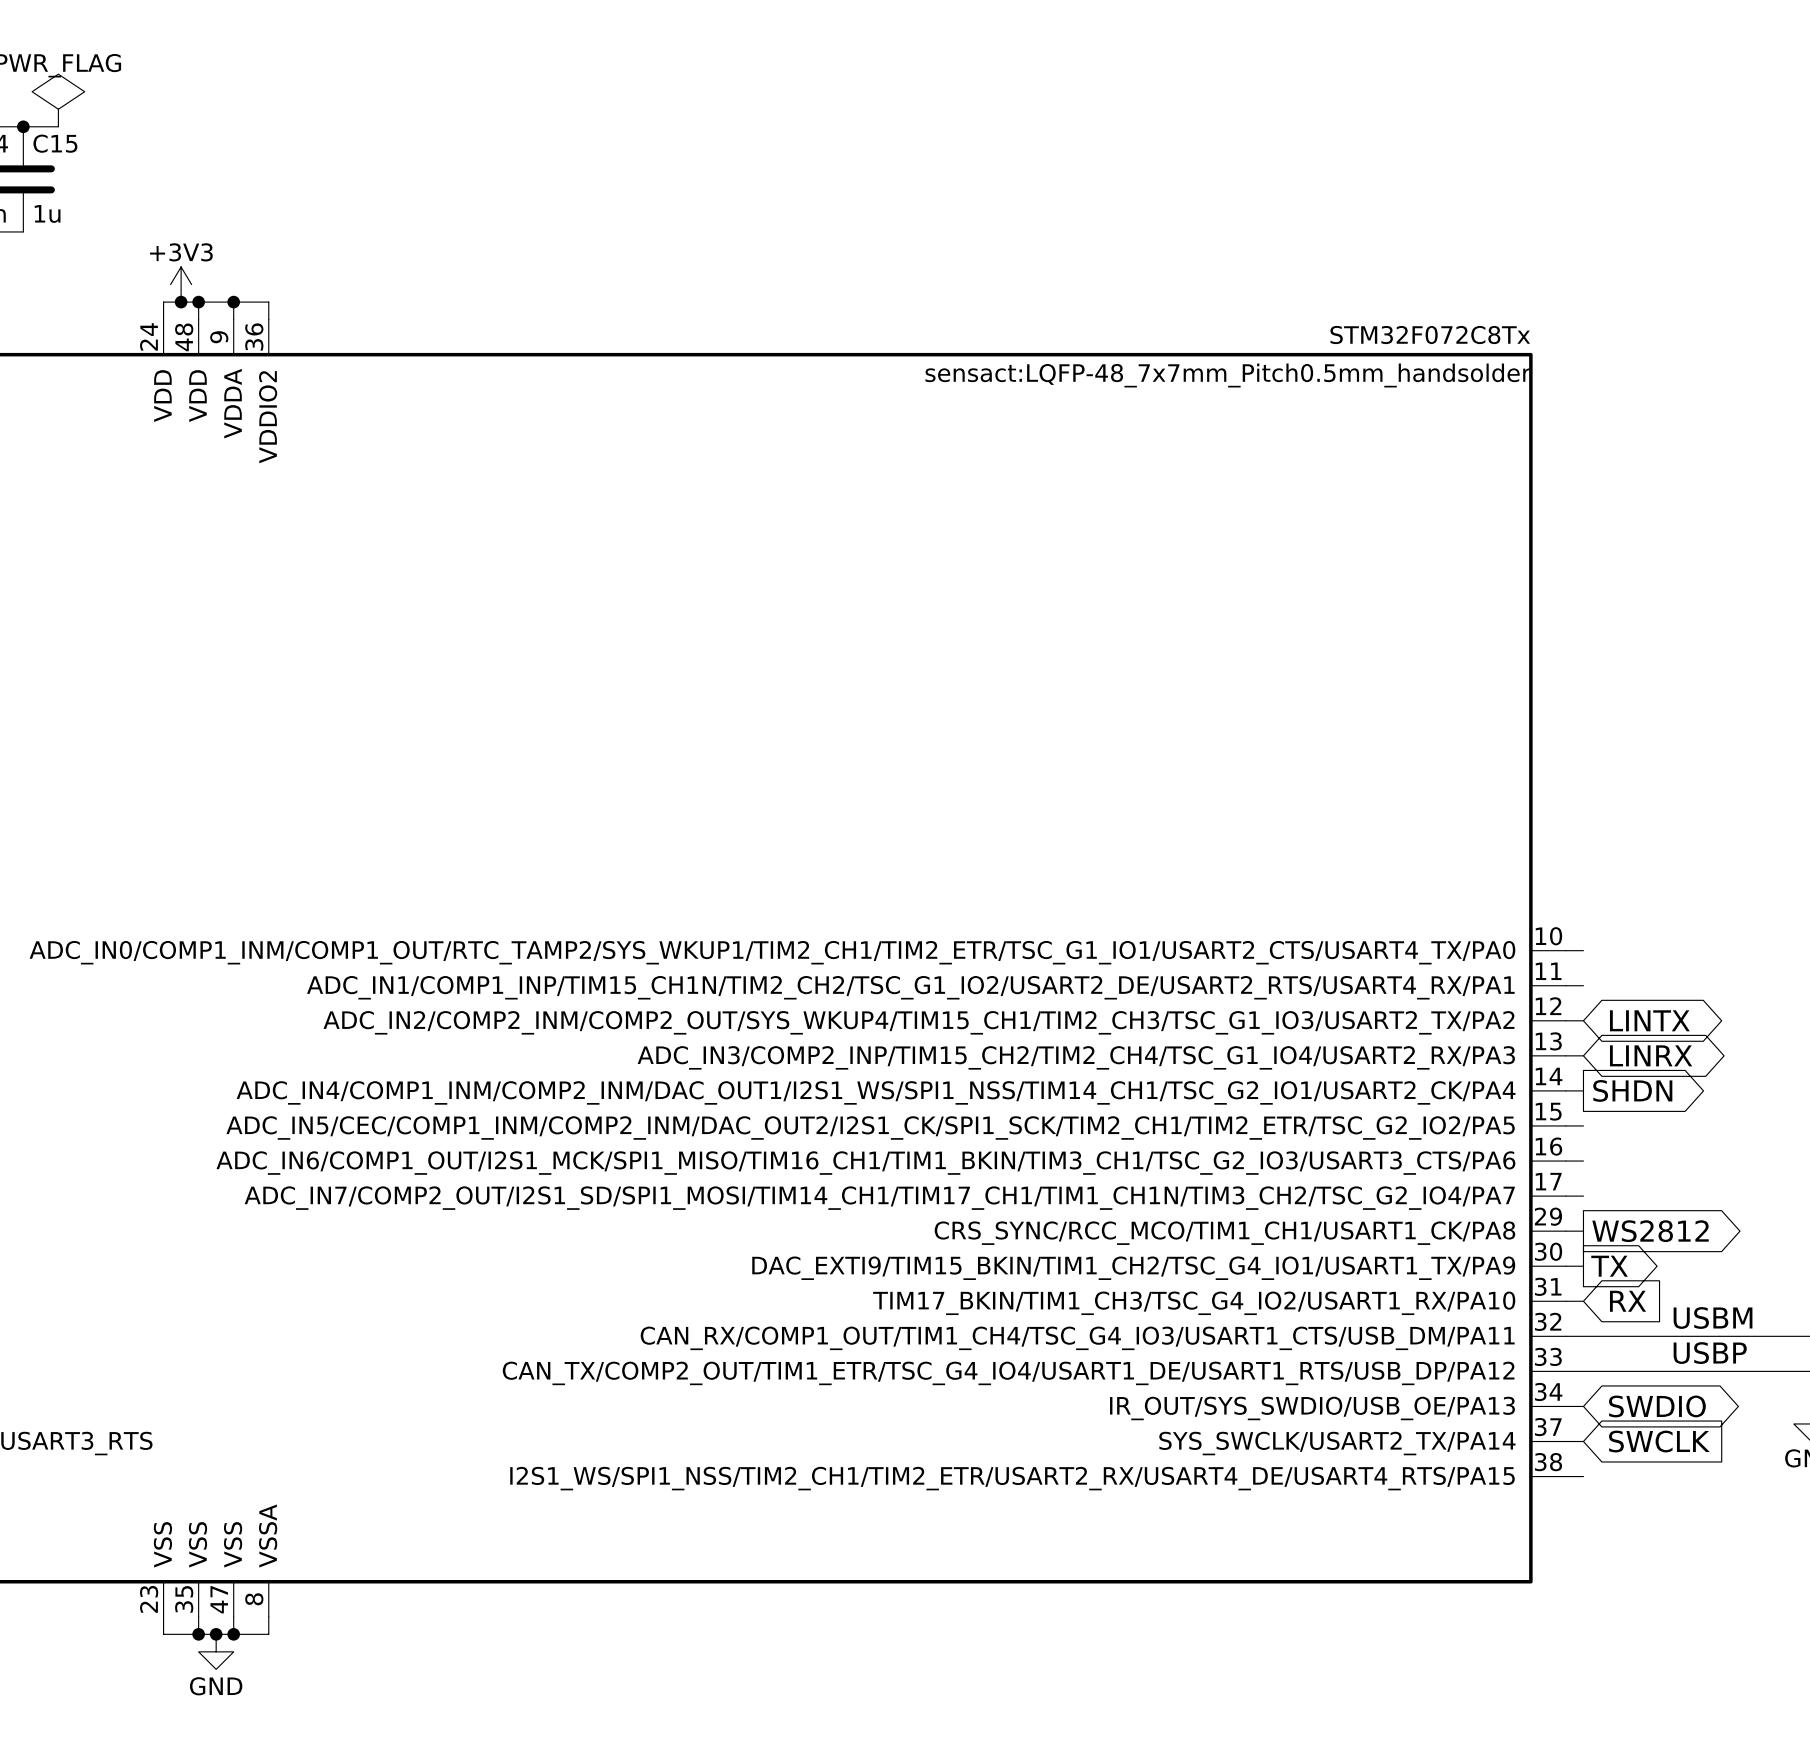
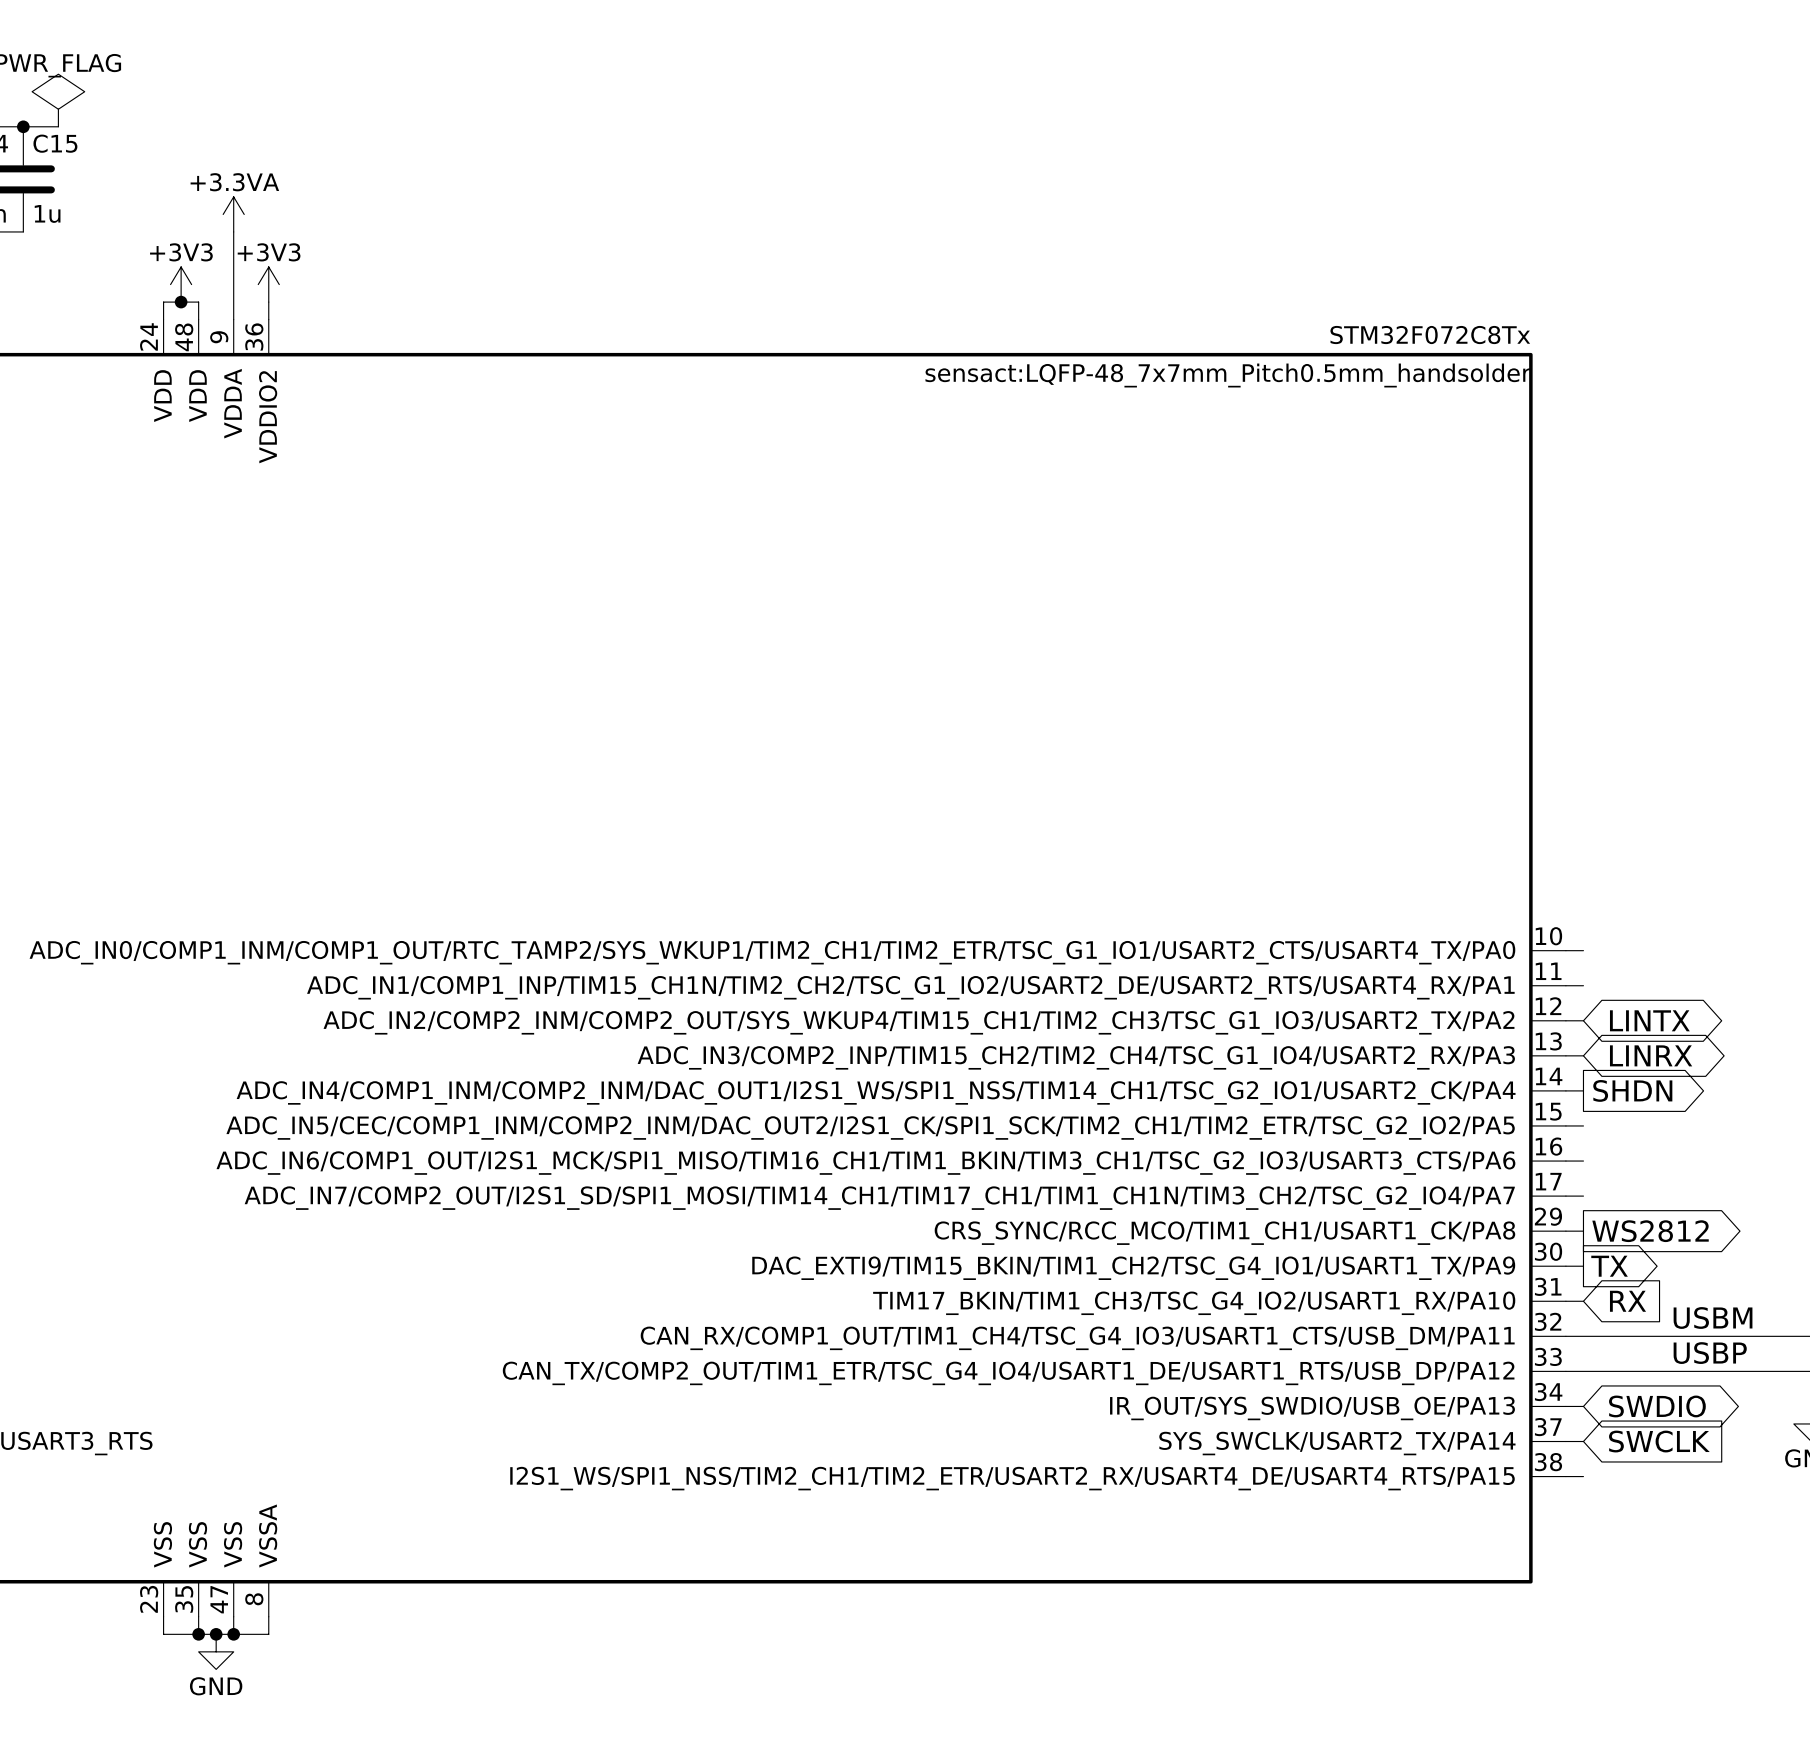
power symbol: none -> +3.3VA (233, 214)
wire: none -> (233, 231) (233, 302)
power symbol: none -> +3V3 (268, 284)
wire: (198, 302) (268, 302) -> none
junction: (198, 302) -> none
junction: (233, 302) -> none

